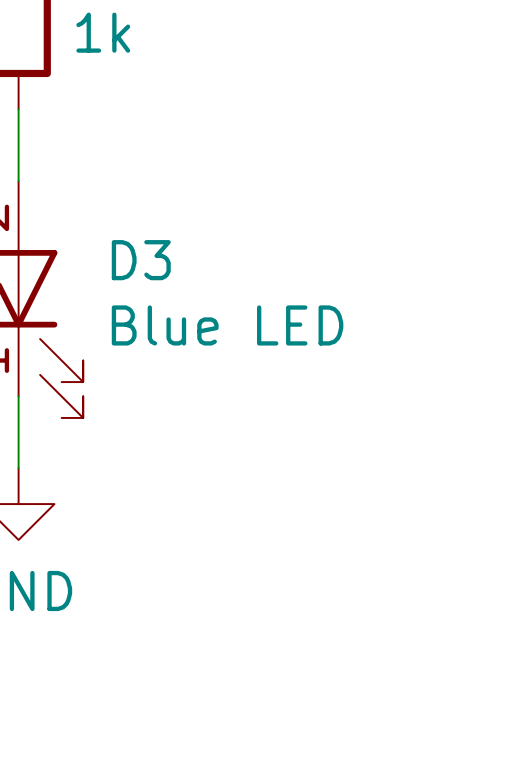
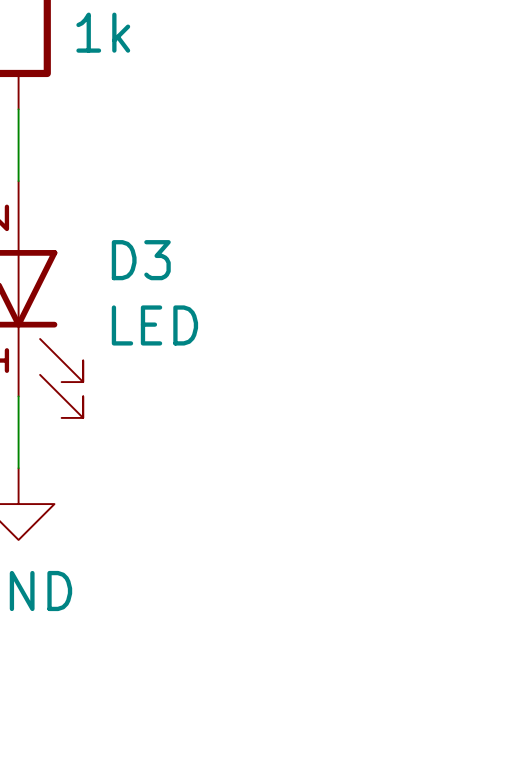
D3 value: Blue LED (227, 325) -> LED (154, 325)

